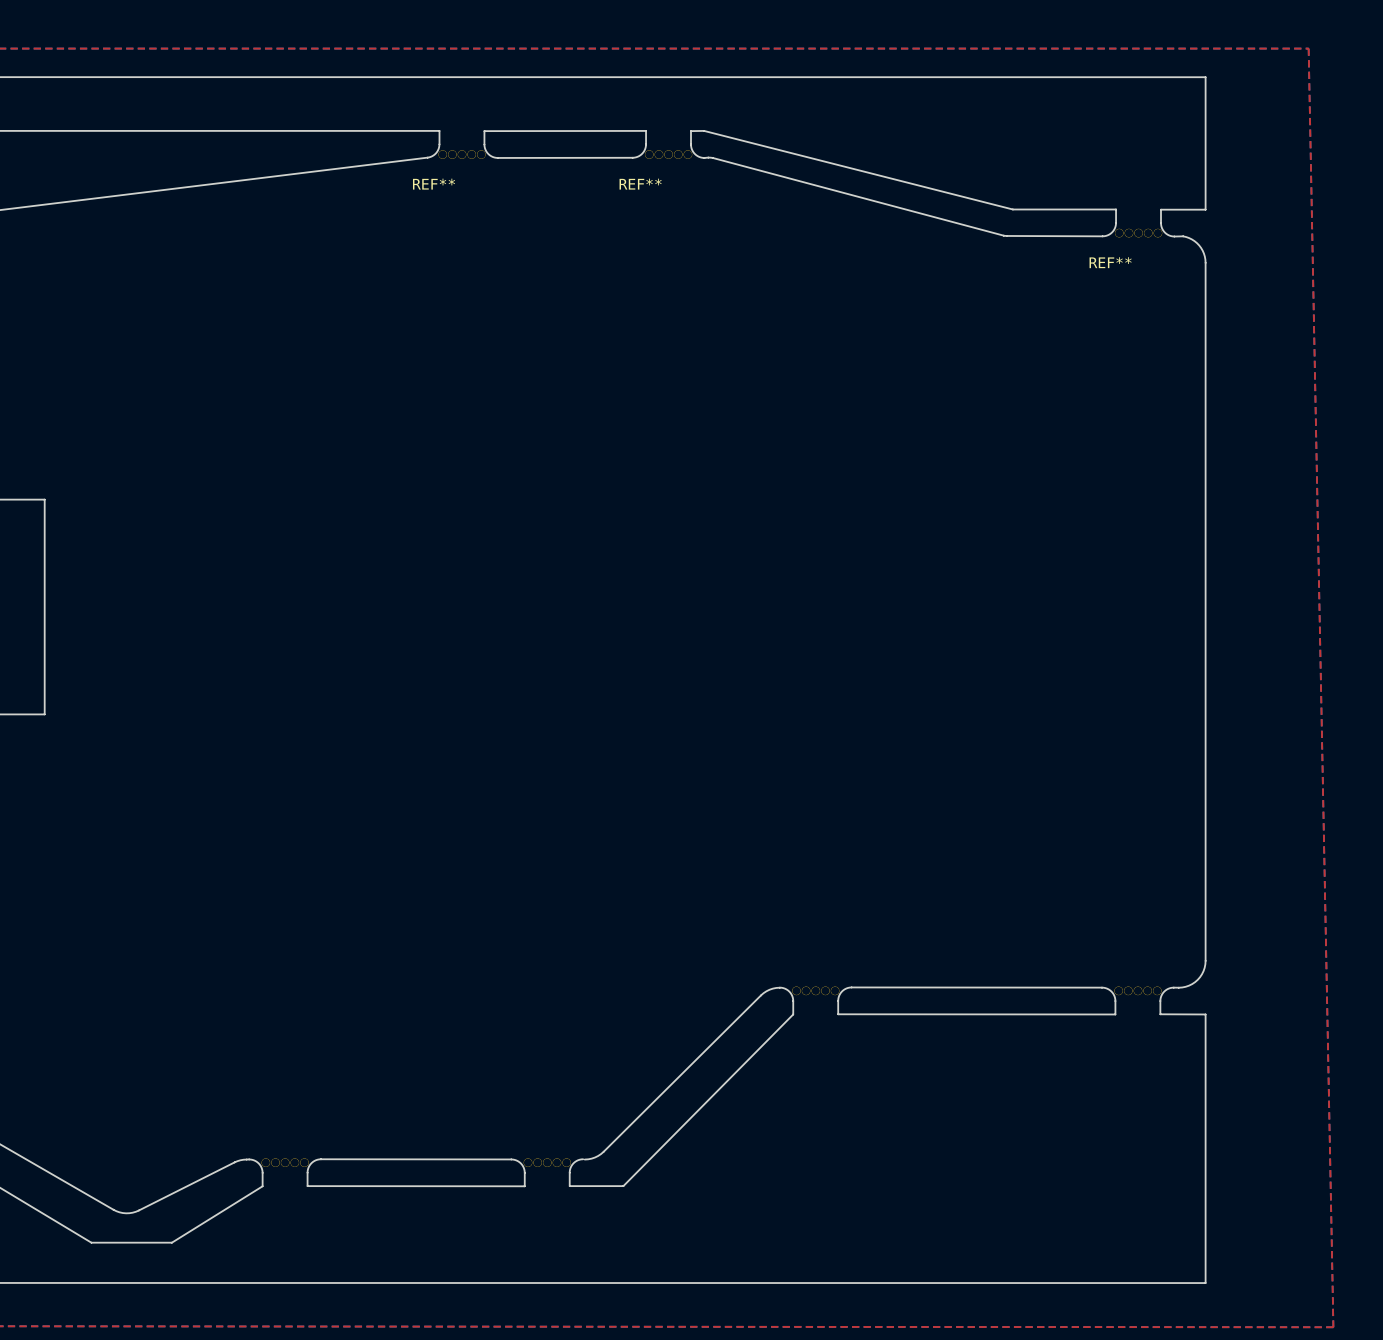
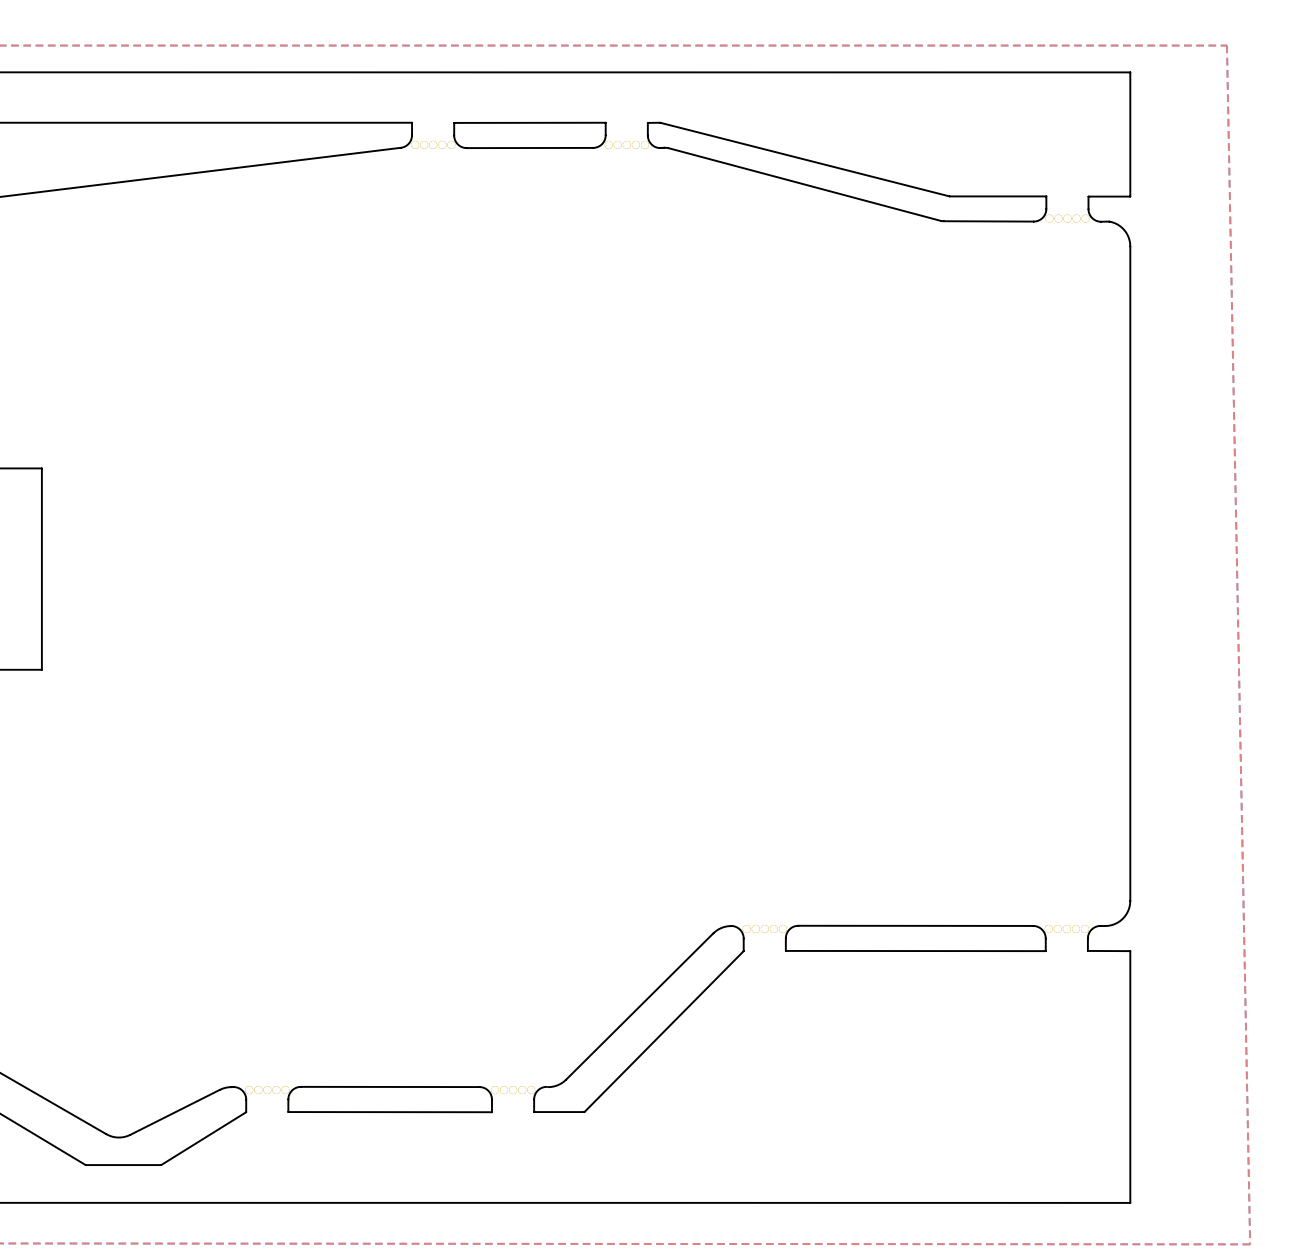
REF** name: REF** (434, 184) -> none
REF** name: REF** (640, 184) -> none
REF** name: REF** (1110, 262) -> none

